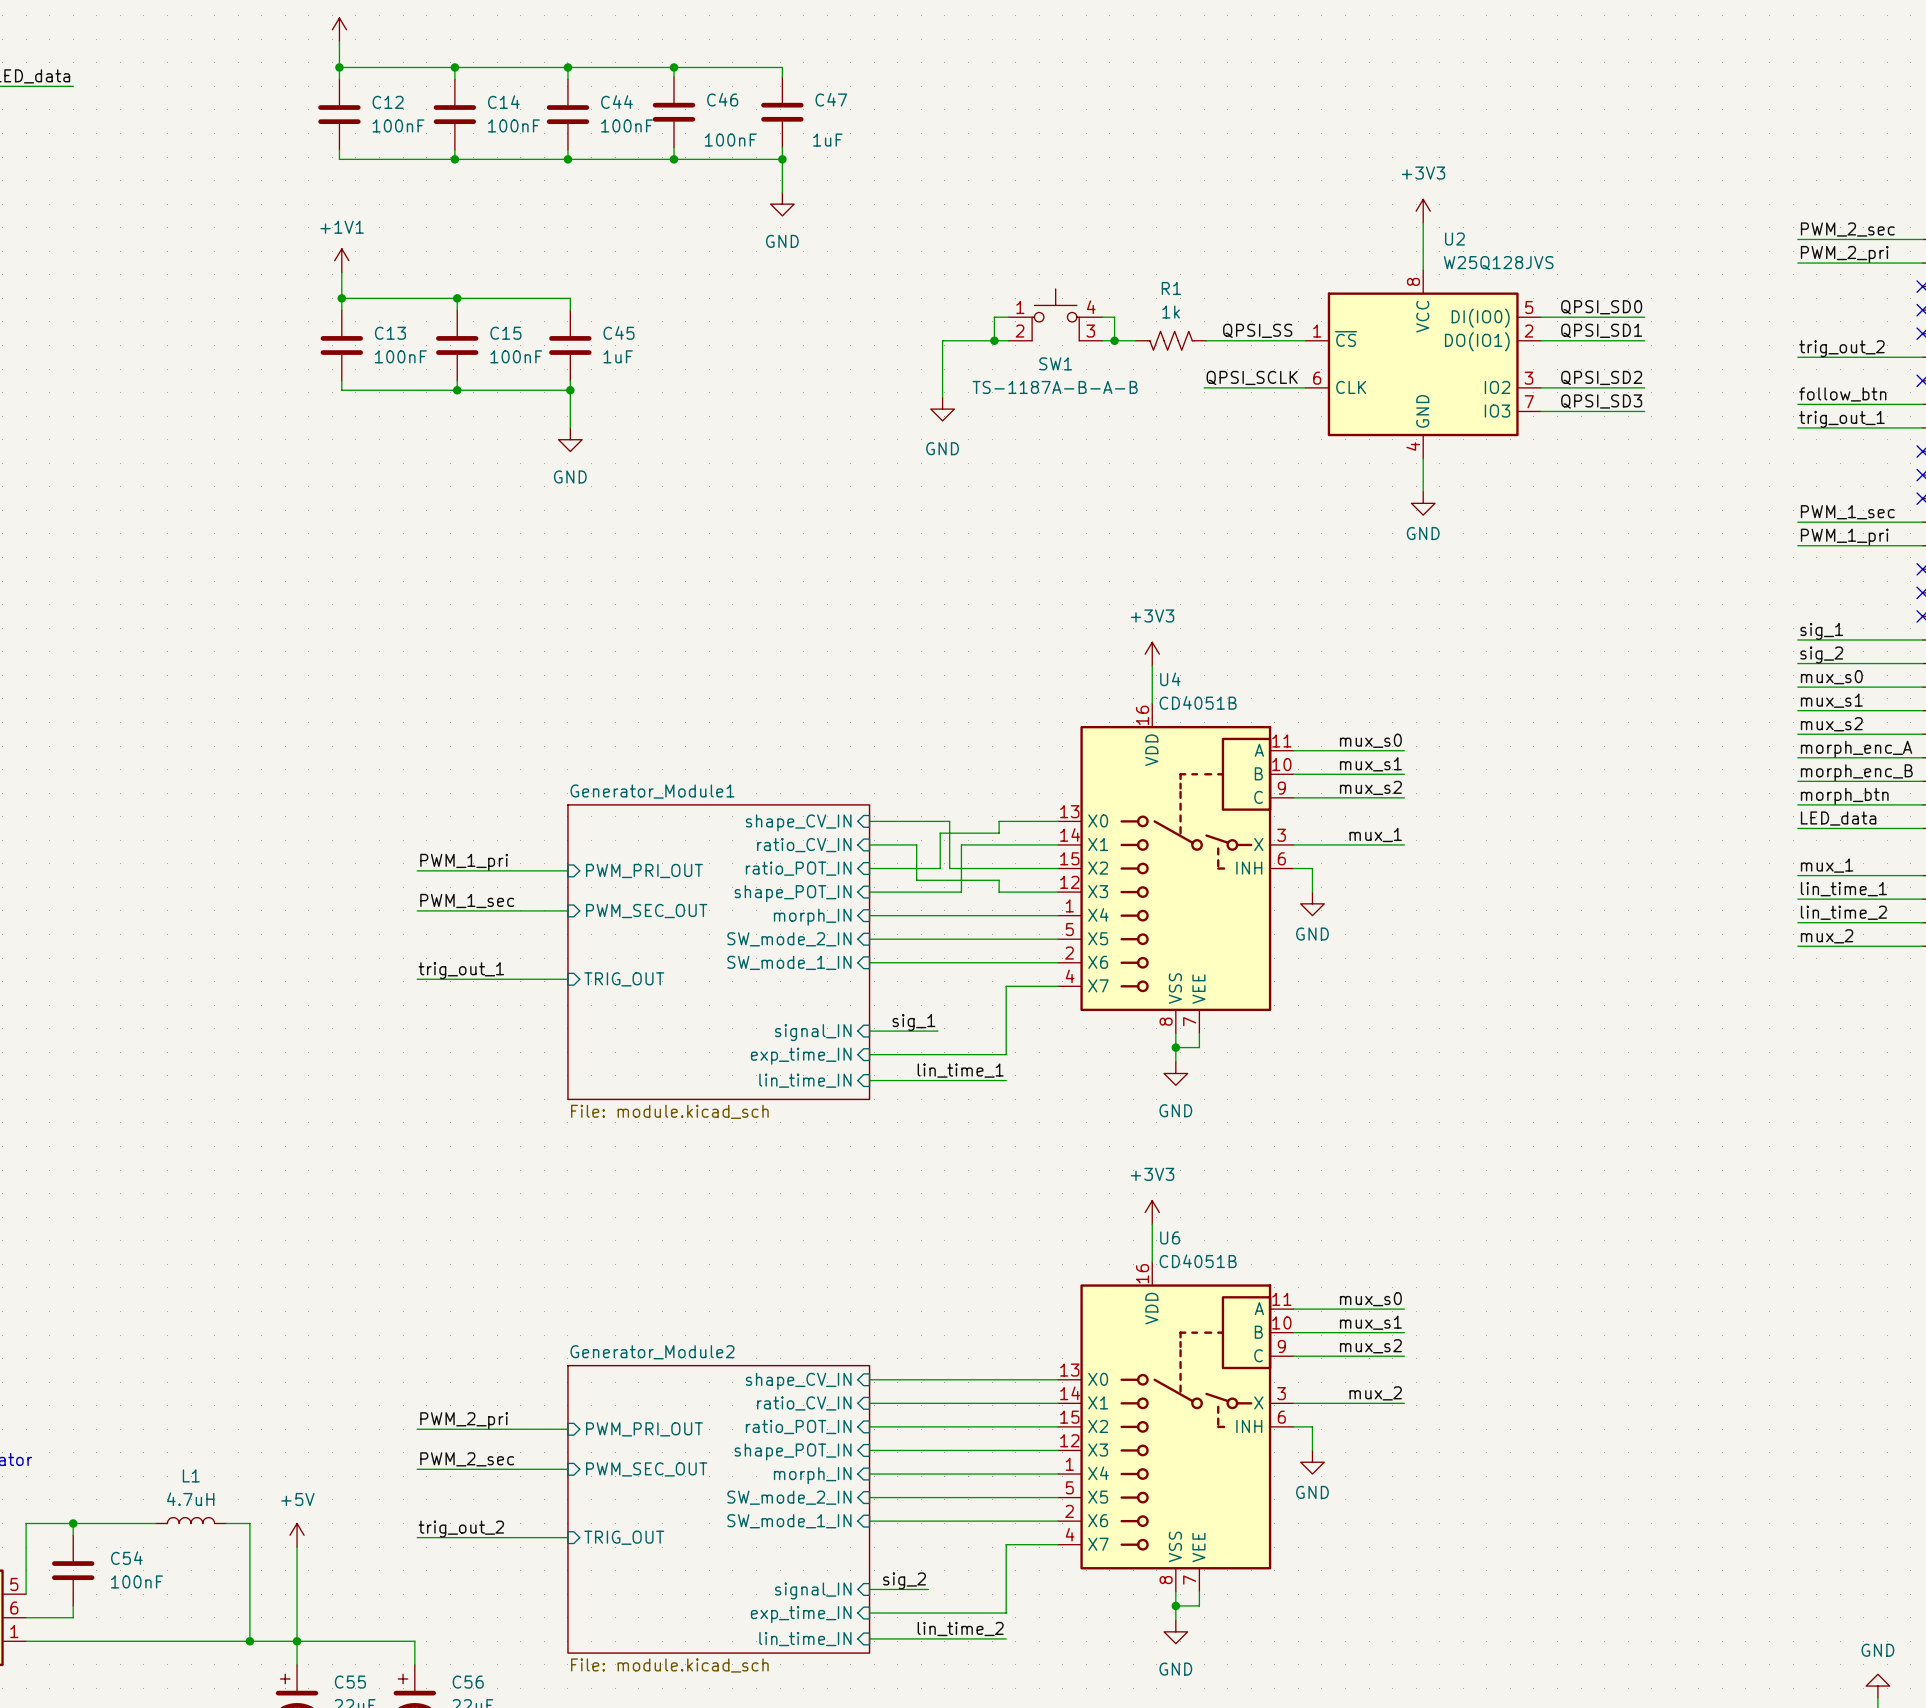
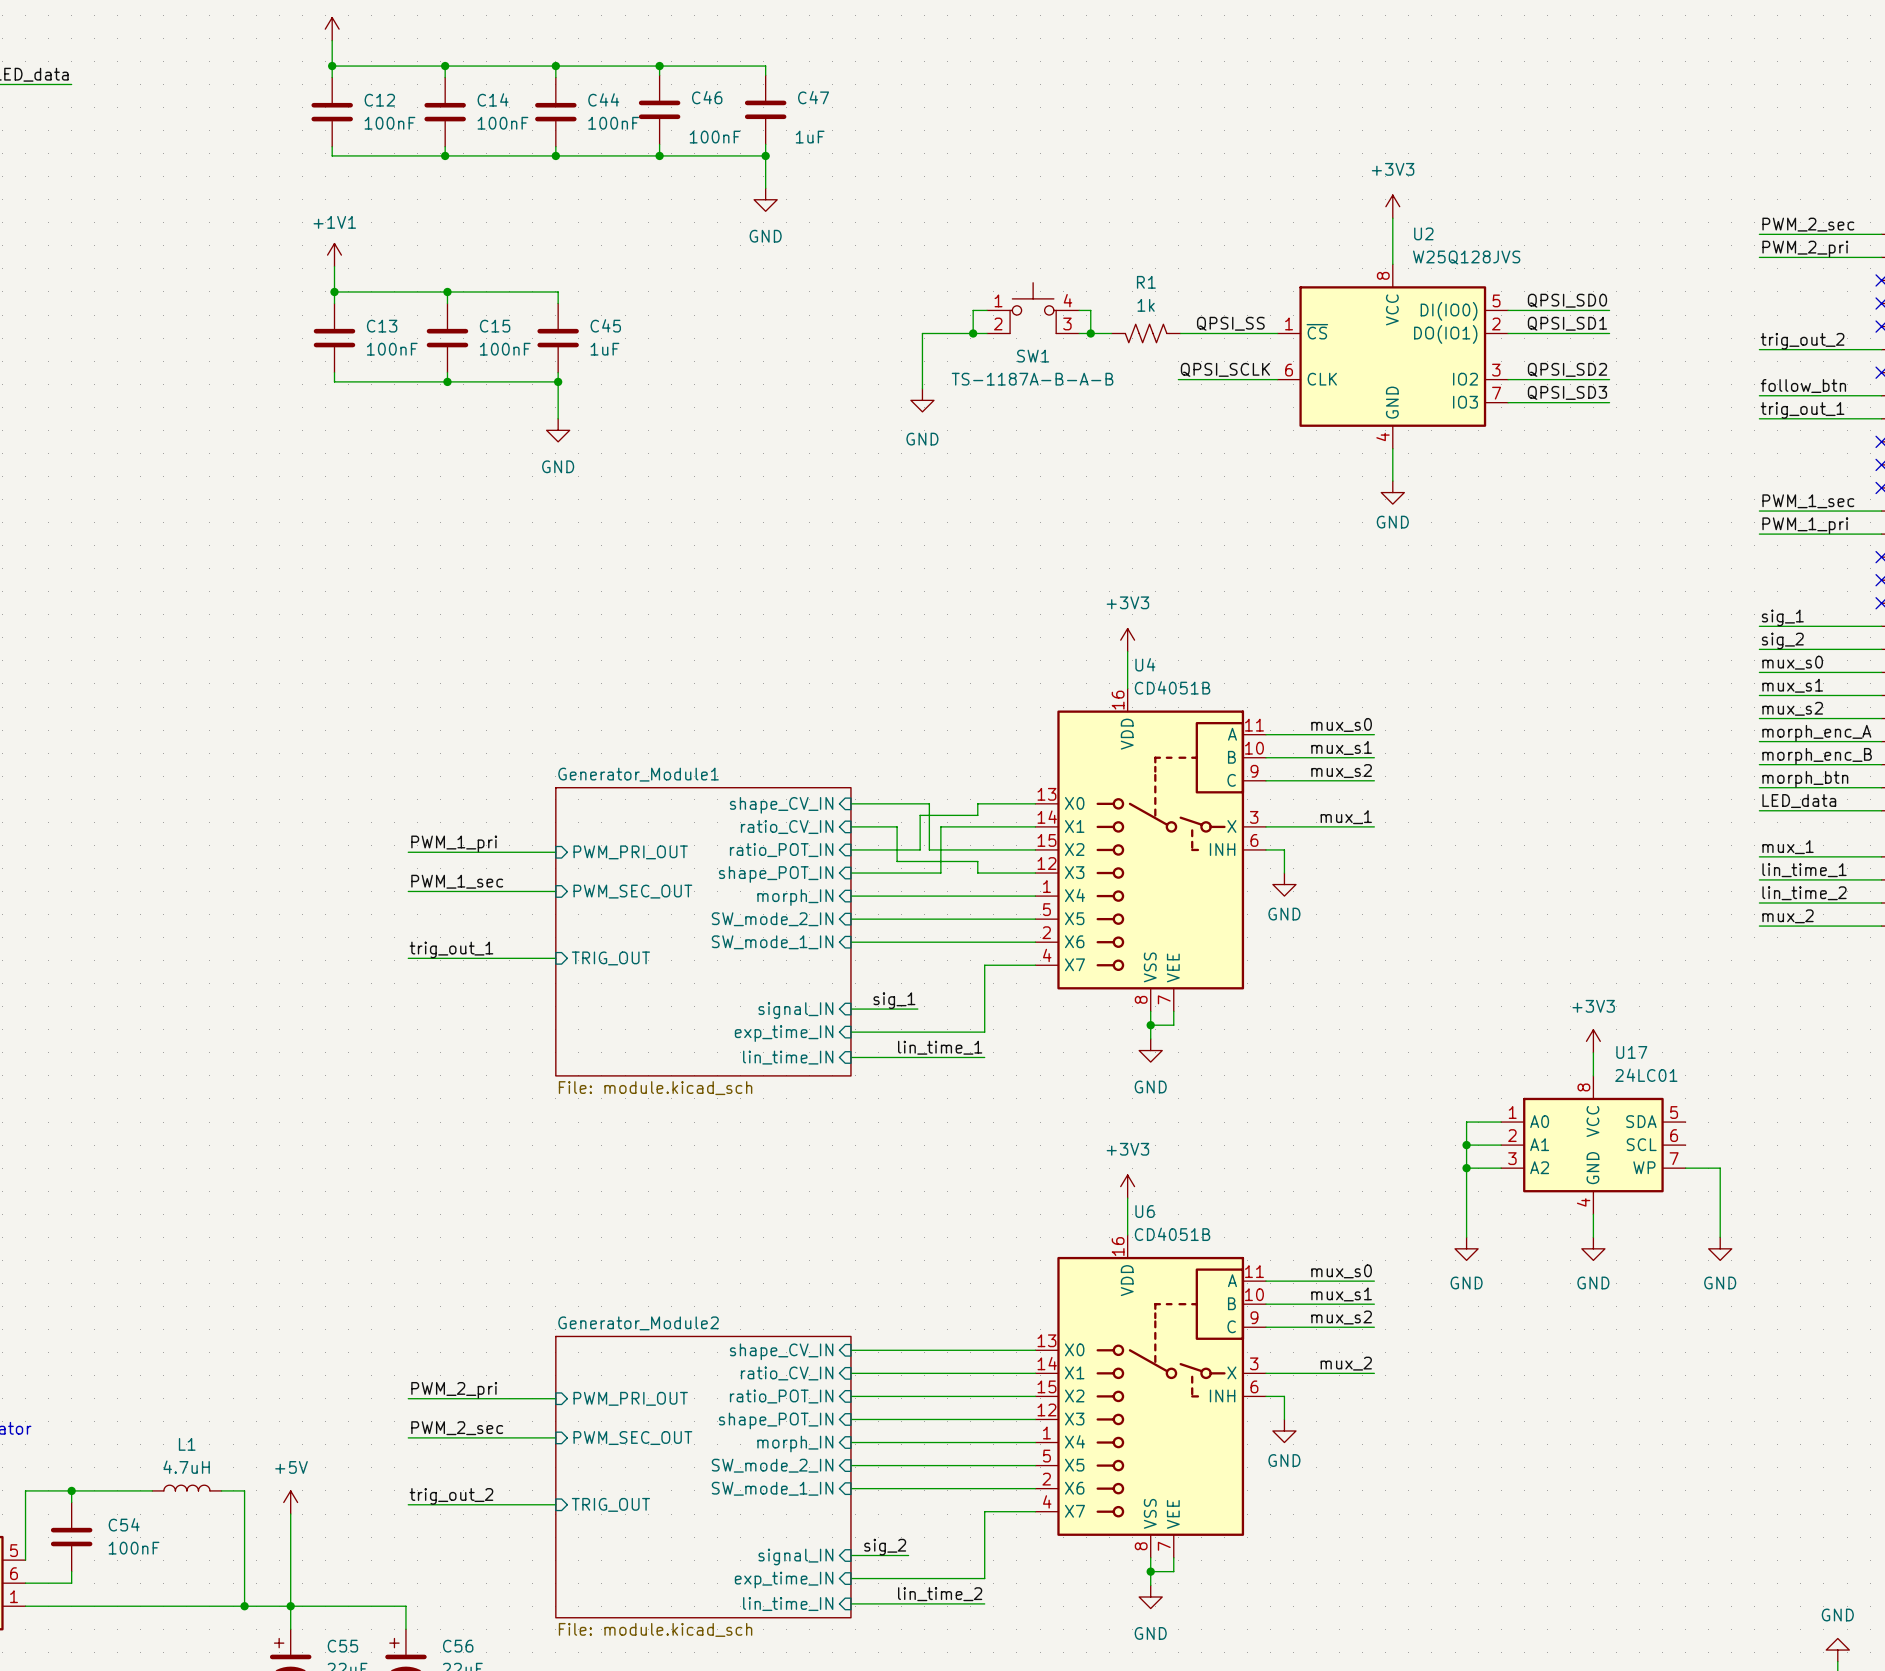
power symbol: none -> +3V3 (1593, 1041)
wire: none -> (1593, 1052) (1593, 1075)
wire: none -> (1501, 1122) (1466, 1122) (1466, 1237)
wire: none -> (1466, 1145) (1501, 1145)
junction: none -> (1466, 1145)
U17: none -> 24LC01 (1593, 1145)
wire: none -> (1466, 1168) (1501, 1168)
junction: none -> (1466, 1168)
wire: none -> (1685, 1168) (1720, 1168) (1720, 1237)
wire: none -> (1593, 1214) (1593, 1237)
power symbol: none -> GND (1466, 1248)
power symbol: none -> GND (1593, 1248)
power symbol: none -> GND (1720, 1248)

